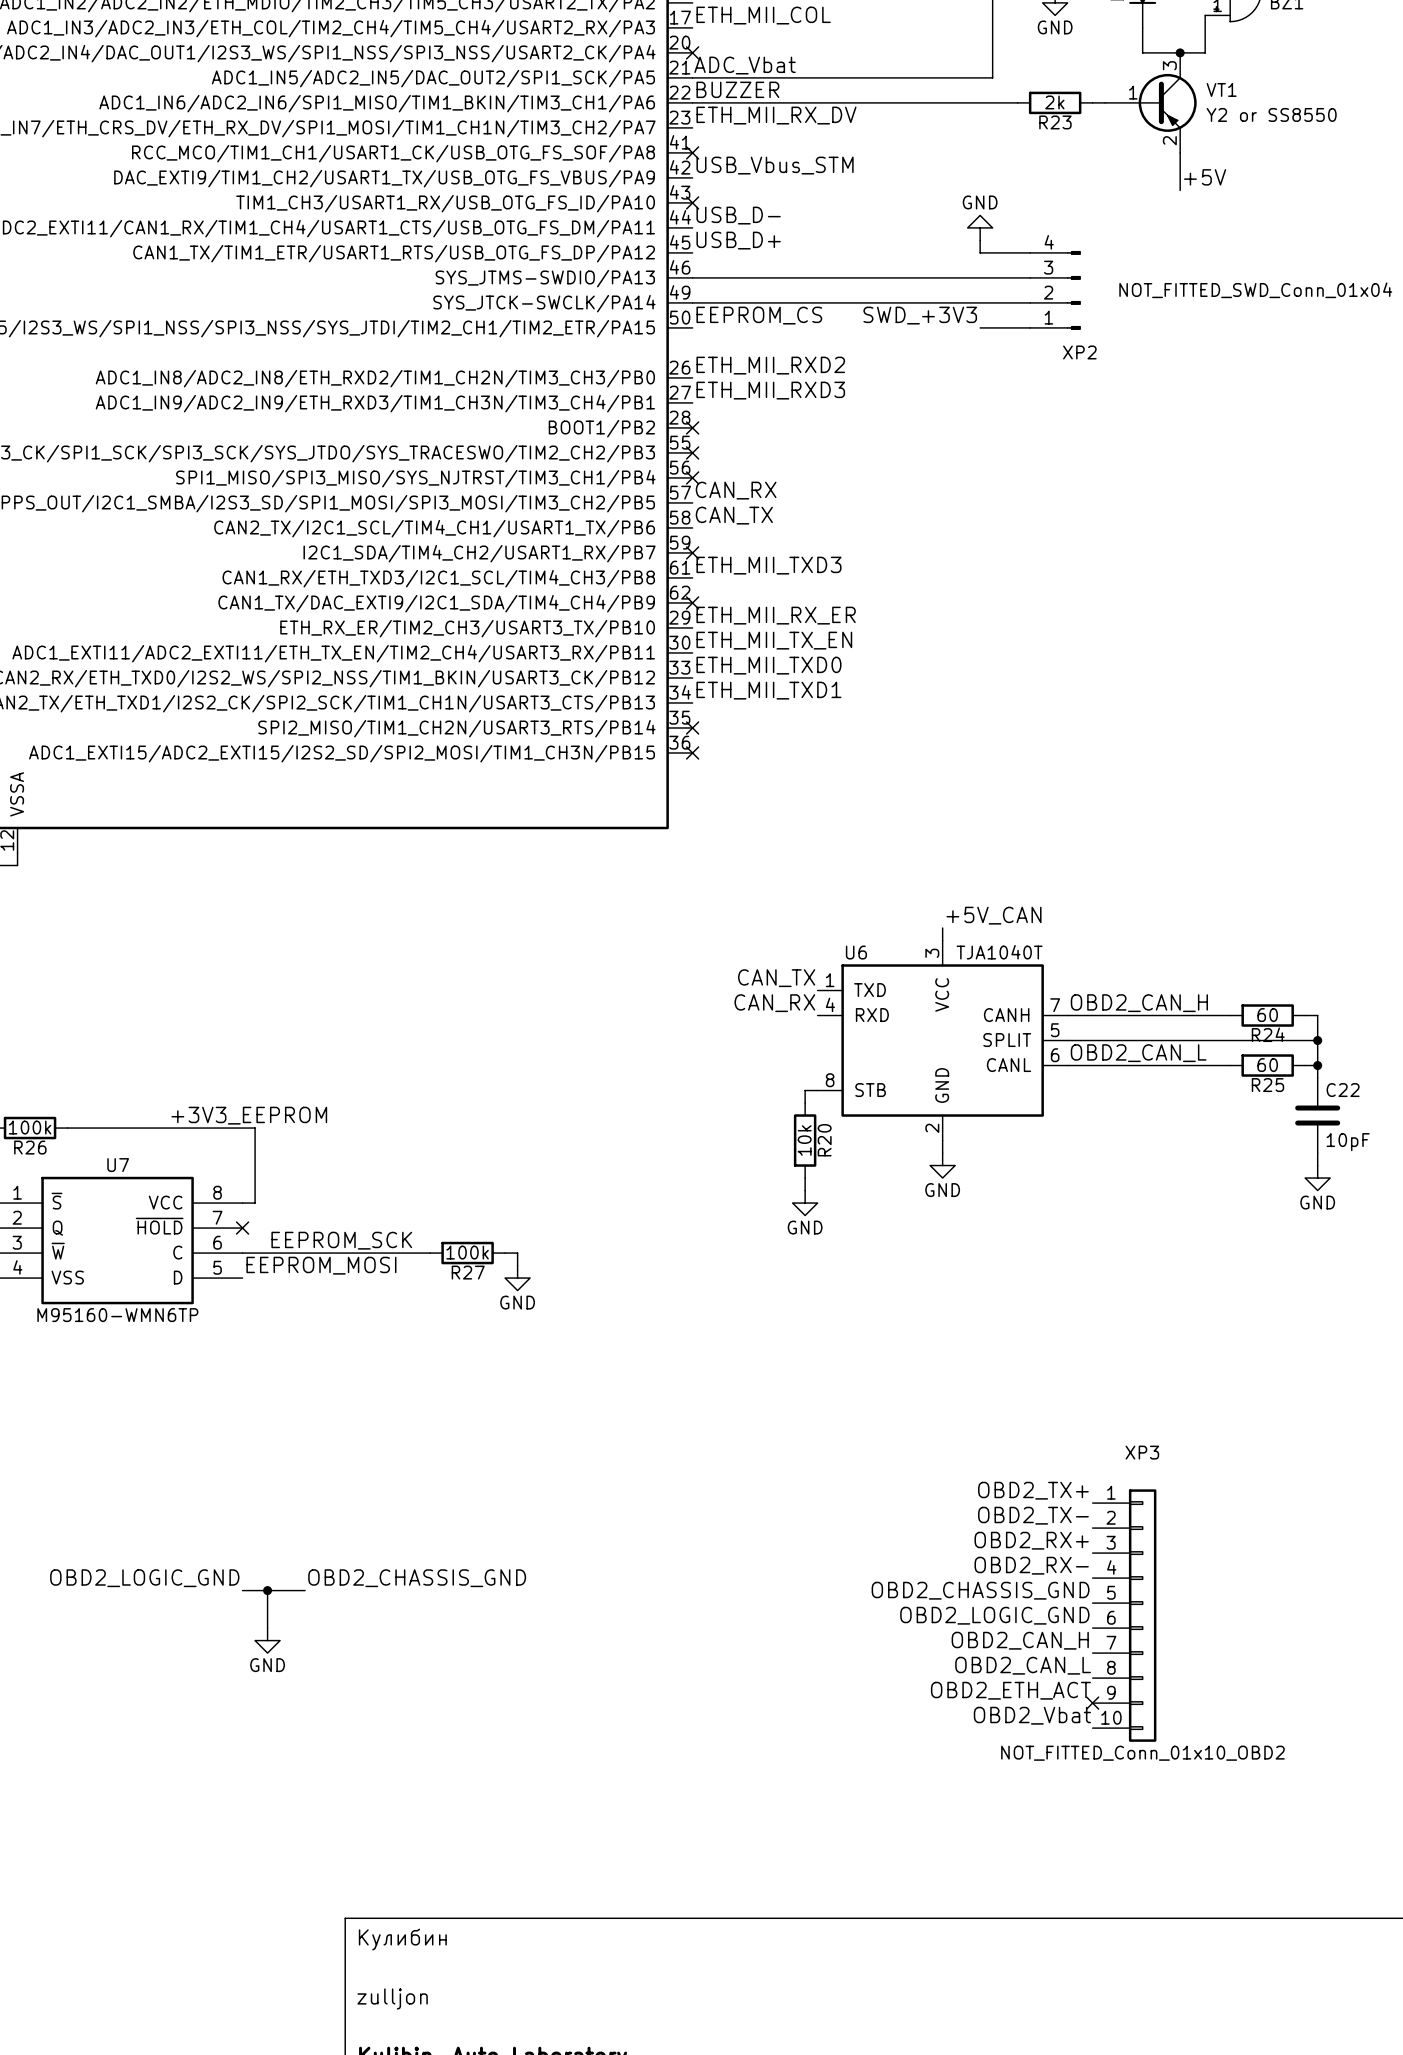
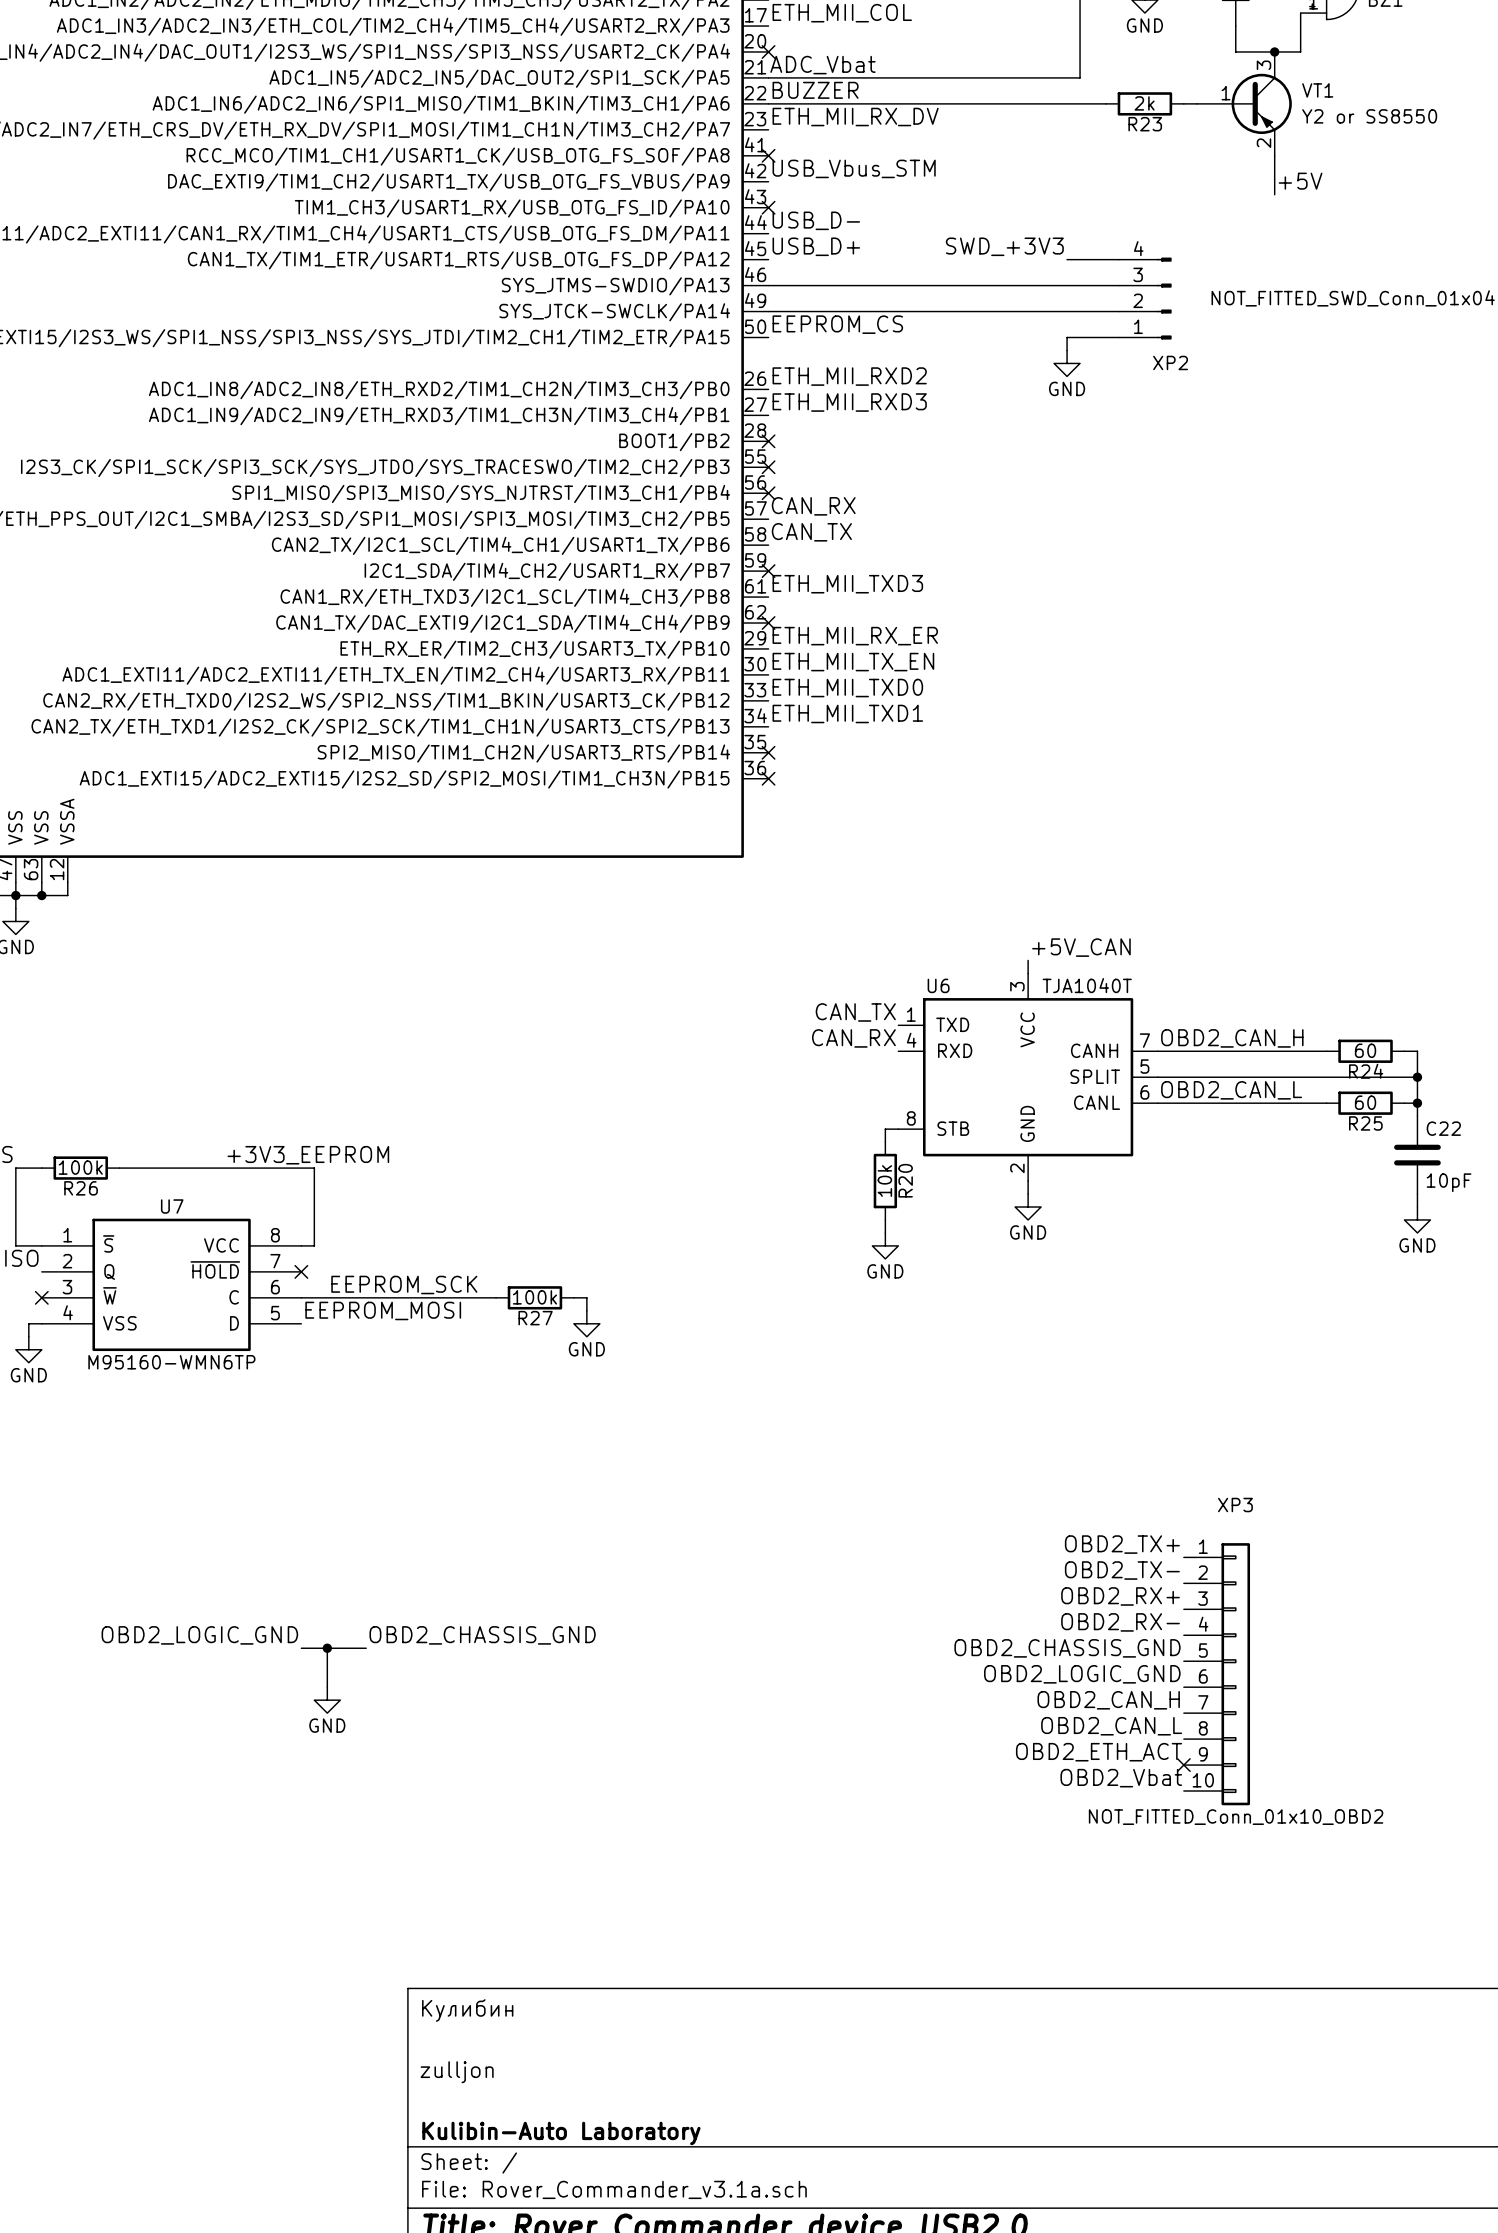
power symbol rotation: 0° (980, 227) -> 180° (1067, 363)
power symbol position: GND (980, 227) -> GND (1067, 363)
wire: (980, 240) (980, 252) -> (1067, 337) (1067, 350)
label position: SWD_+3V3 (920, 315) -> SWD_+3V3 (1004, 246)

